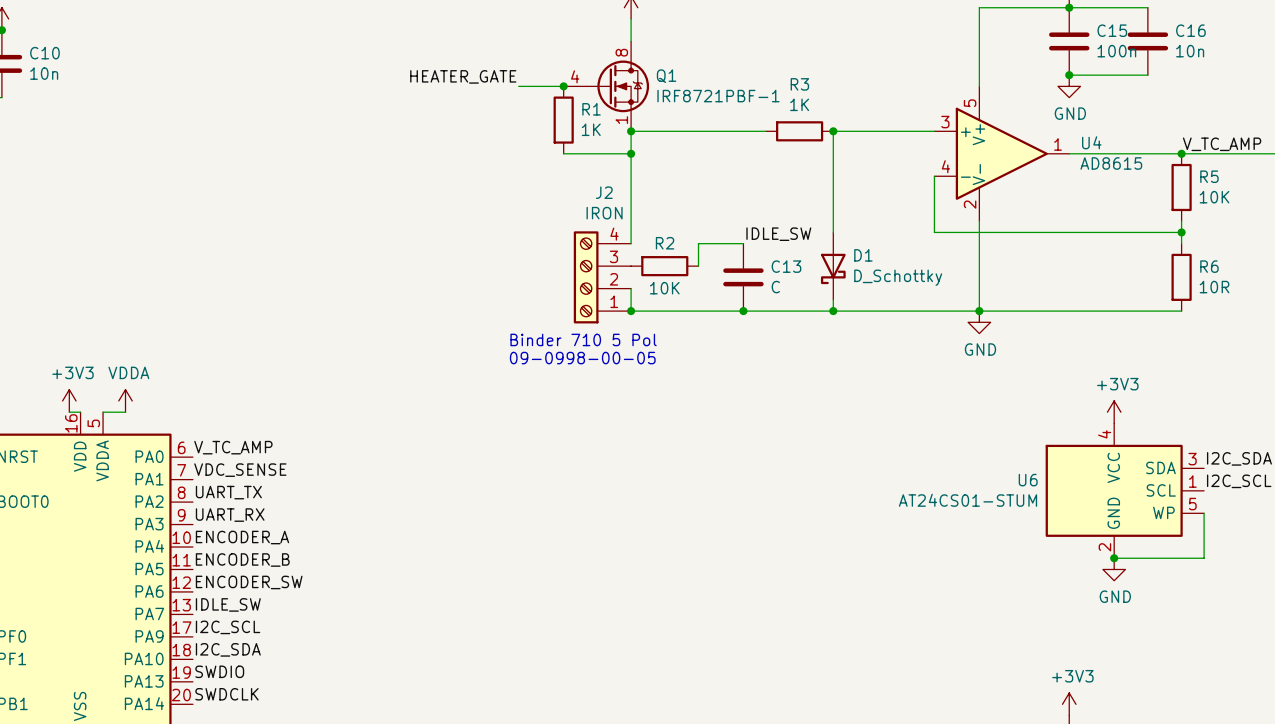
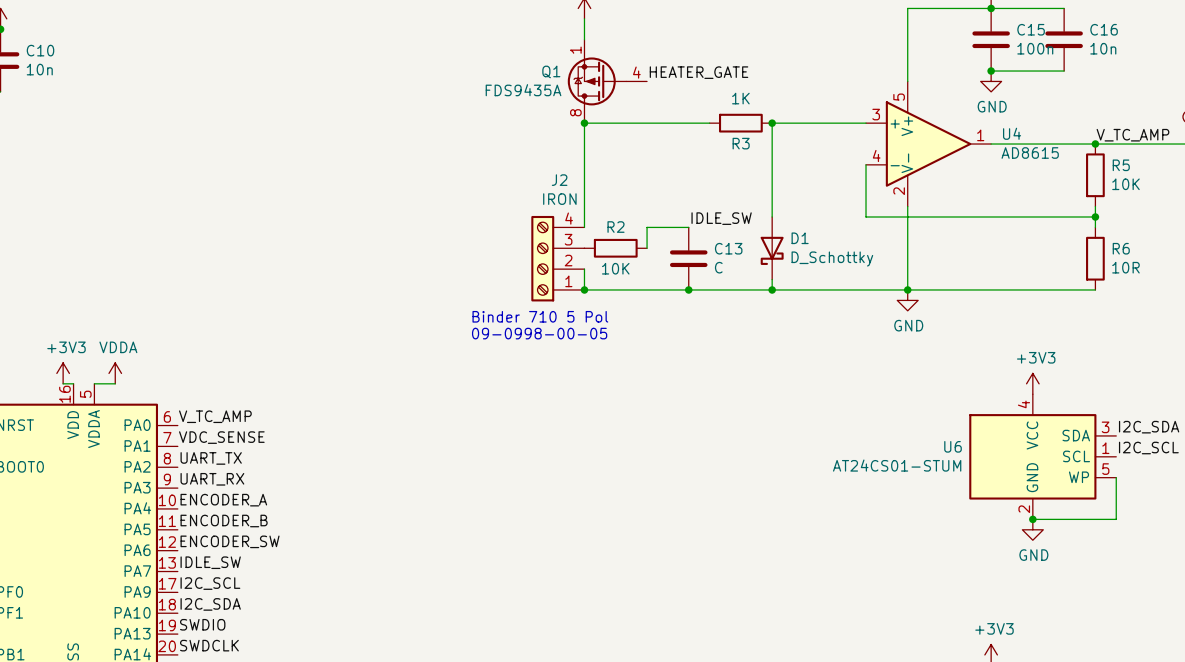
Q1 symbol: [563, 41, 650, 132] -> [567, 39, 648, 124]
label position: HEATER_GATE (463, 76) -> HEATER_GATE (699, 72)
Q1 name position: Q1 (666, 76) -> Q1 (551, 71)
R3 name position: R3 (799, 84) -> R3 (741, 143)
wire: (518, 86) (563, 86) -> none
junction: (563, 86) -> none
Q1 value: IRF8721PBF-1 (718, 96) -> FDS9435A (523, 90)
R1: 1K (563, 120) -> none
wire: (563, 153) (631, 153) -> none
junction: (631, 153) -> none

